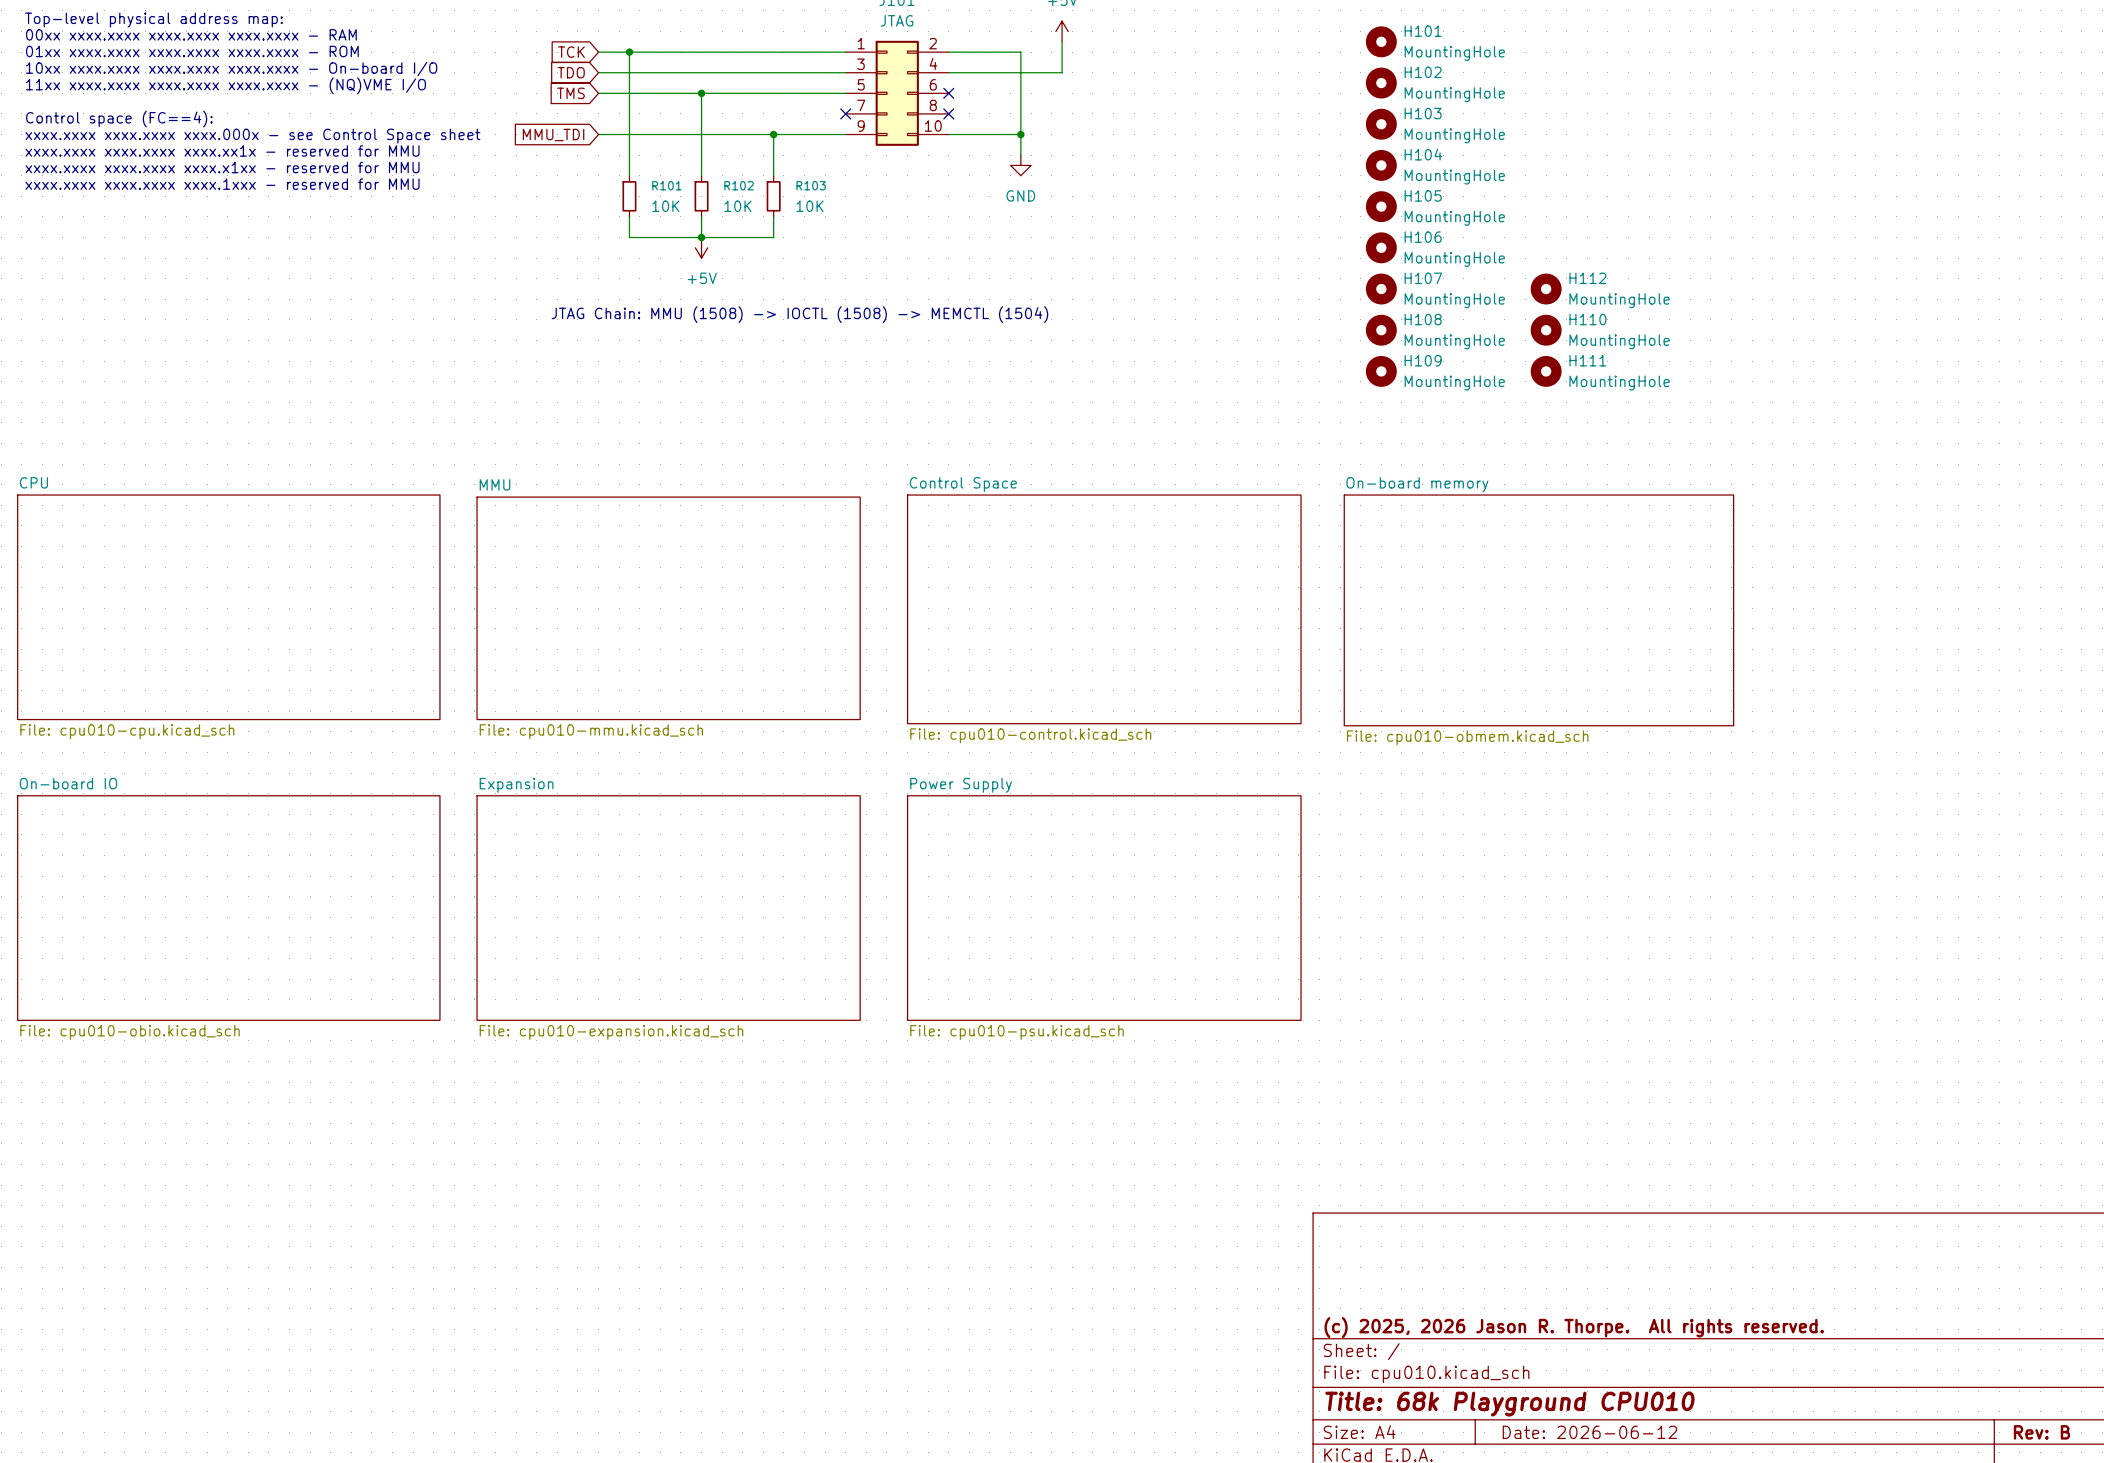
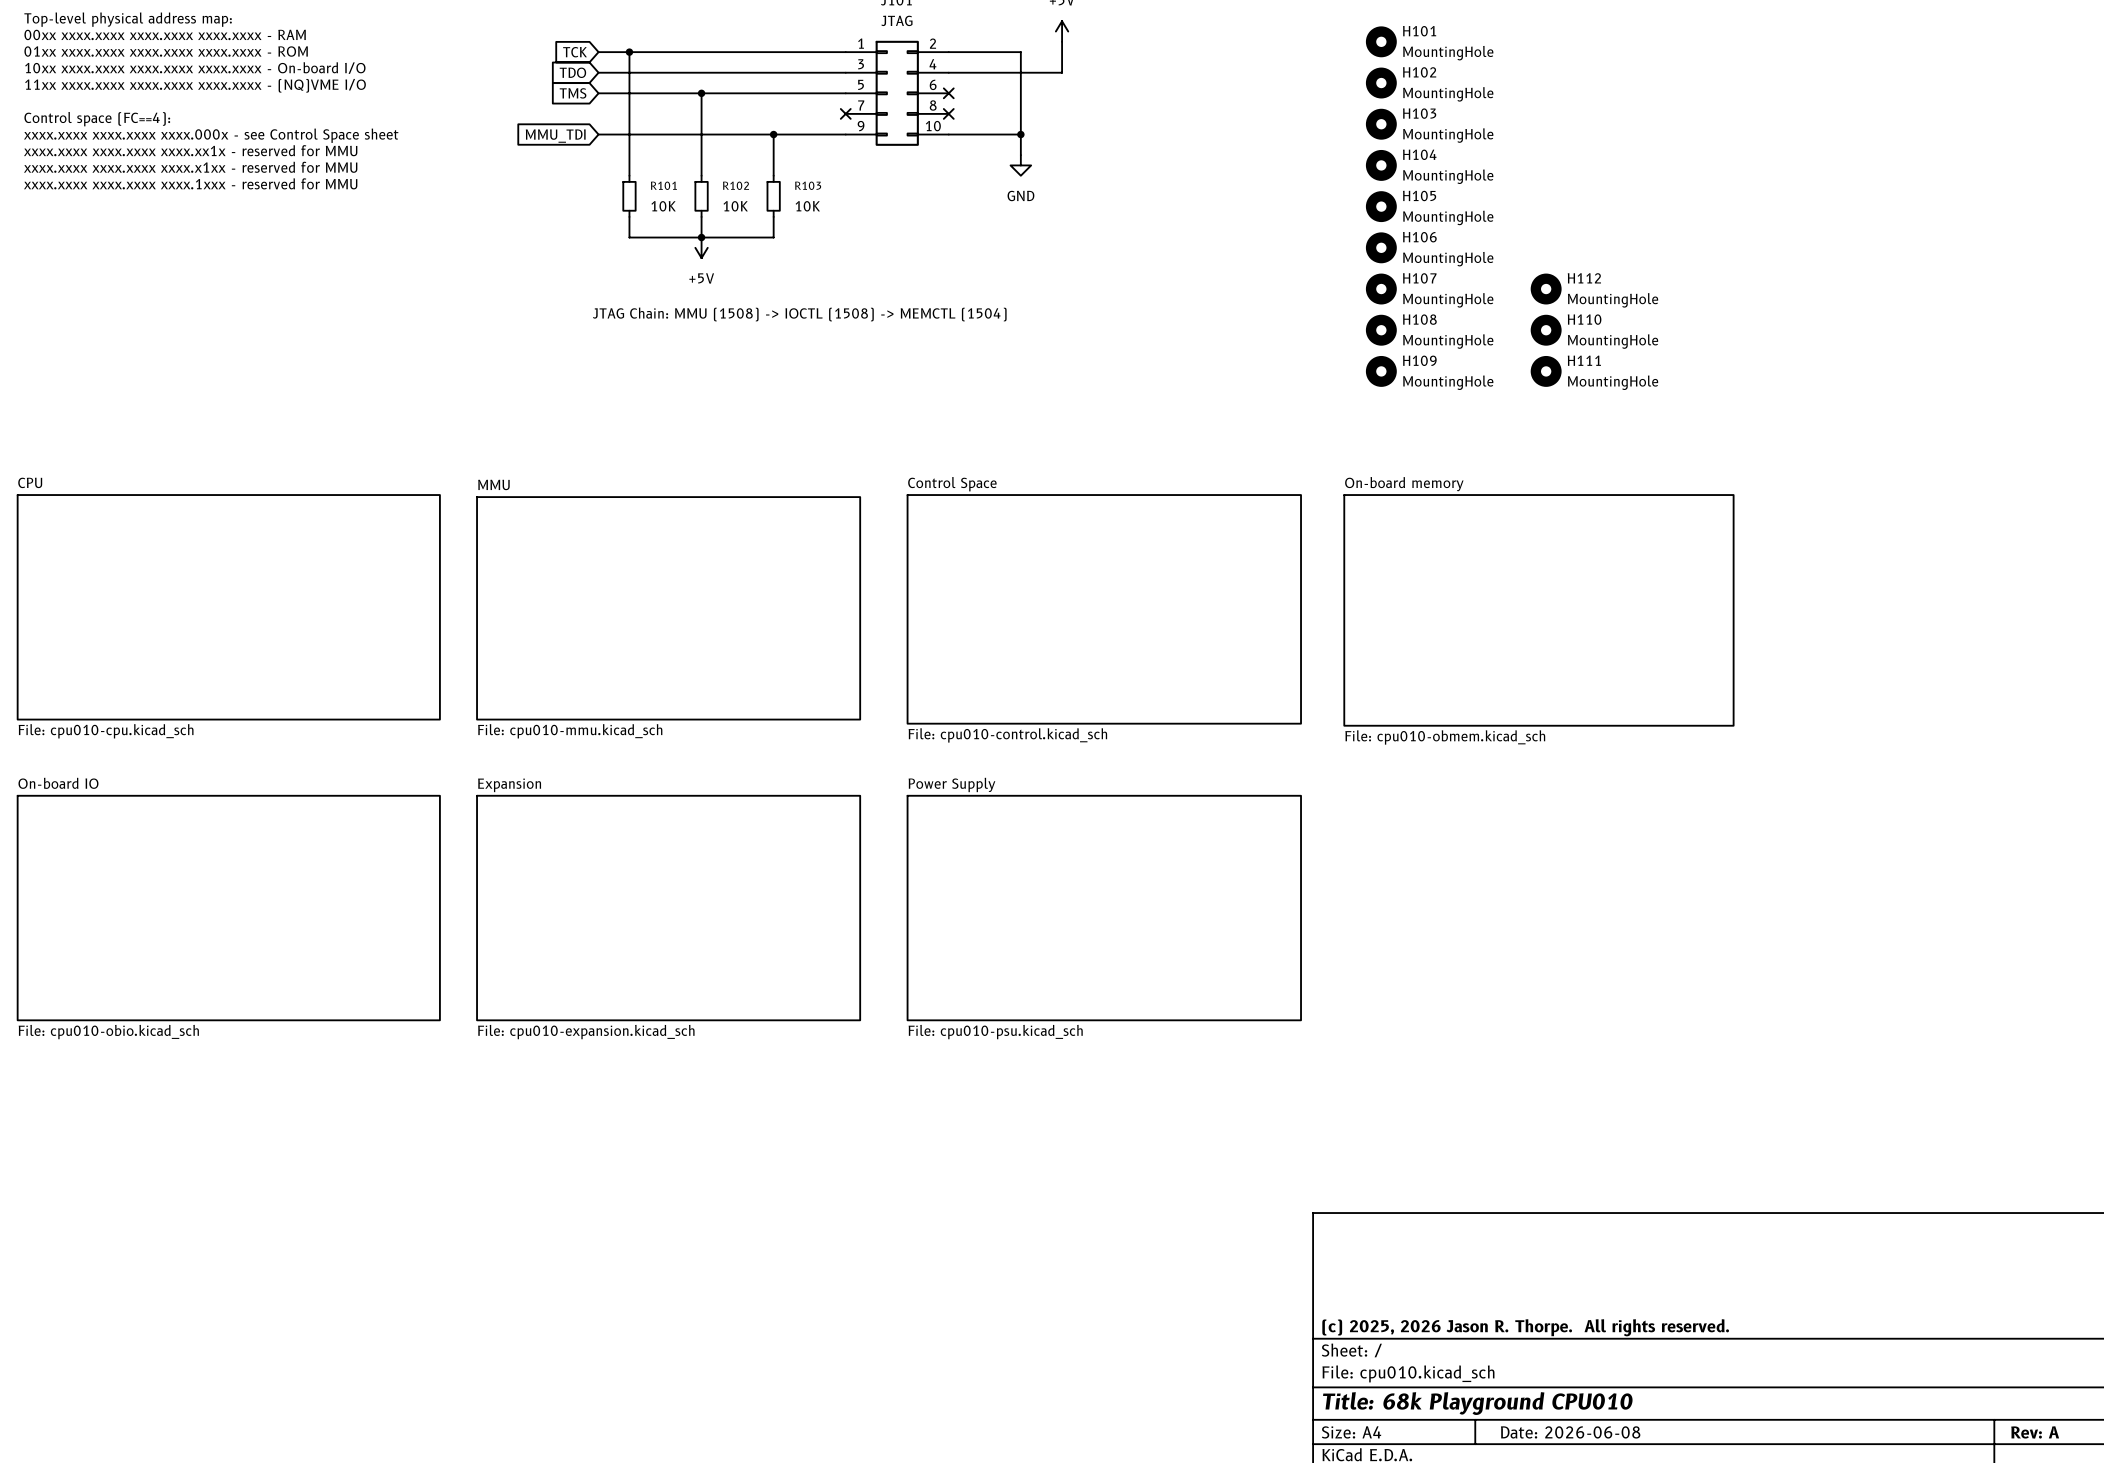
title block: Date: 2026-06-12 (1589, 1432) -> Date: 2026-06-08 (1570, 1432)
title block: Rev: B (2041, 1432) -> Rev: A (2035, 1432)

